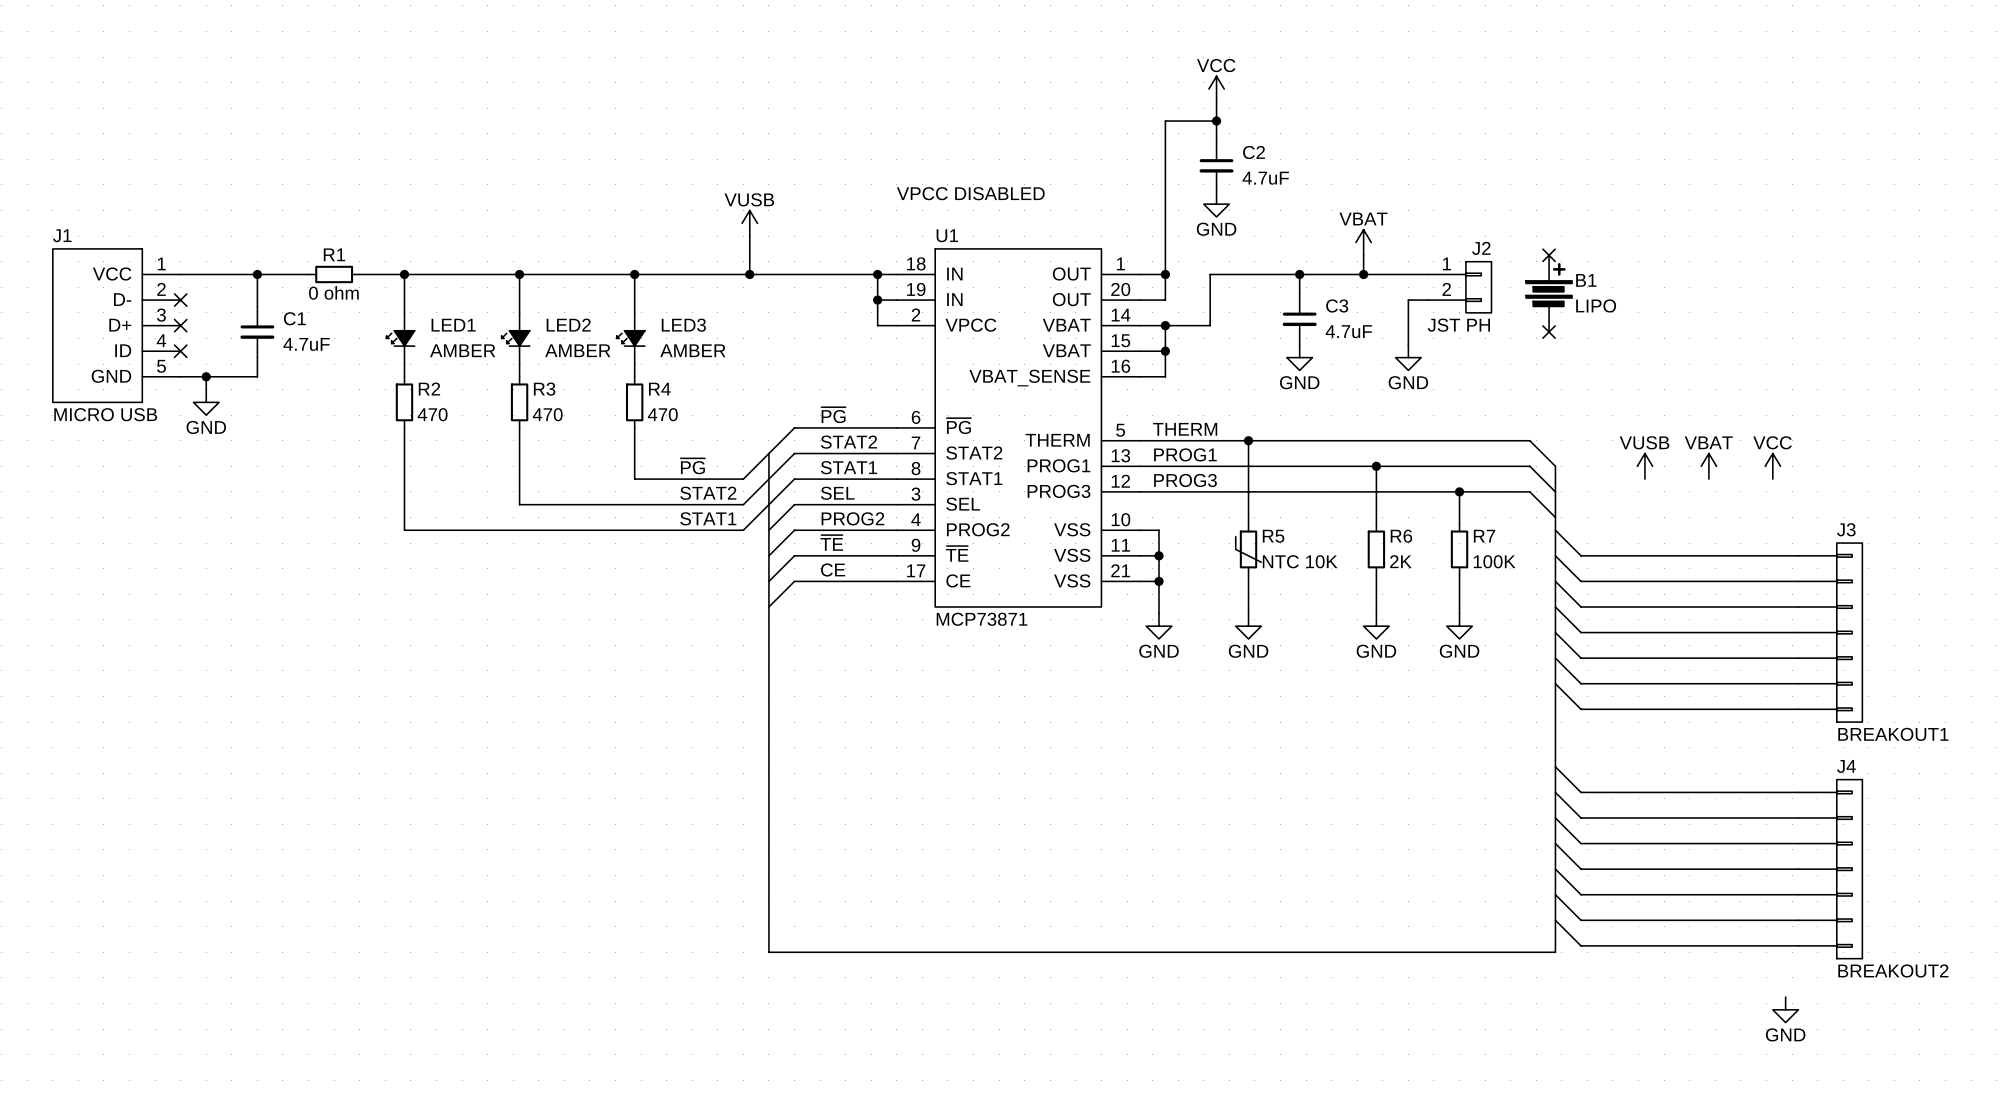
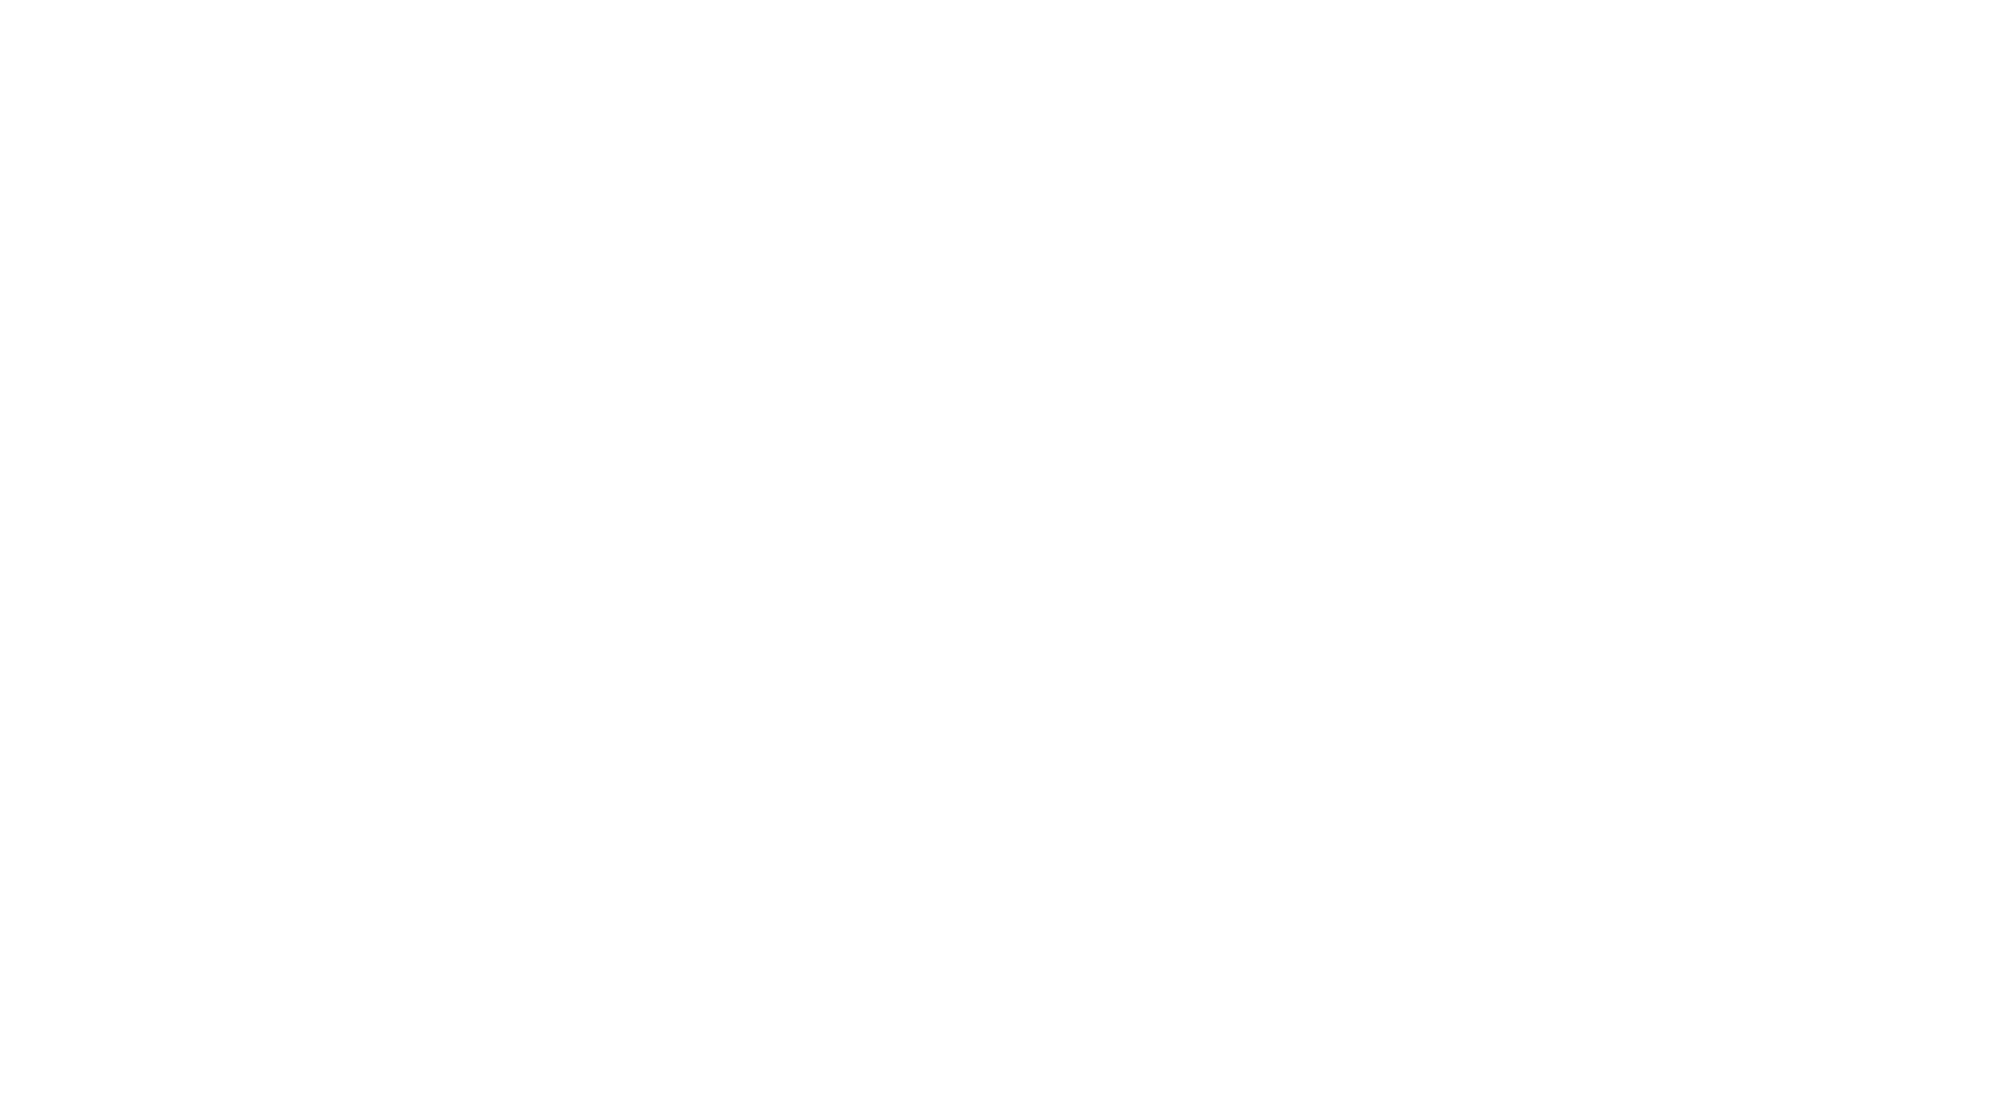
power symbol: VCC (1216, 89) -> none
wire: (1216, 101) (1216, 140) -> none
wire: (1216, 121) (1165, 121) (1165, 300) (1139, 300) -> none
junction: (1216, 121) -> none
C2: 4.7uF (1216, 165) -> none
text: VPCC DISABLED (970, 193) -> none
power symbol: GND (1216, 204) -> none
power symbol: VUSB (749, 223) -> none
wire: (749, 236) (749, 274) -> none
power symbol: VBAT (1363, 242) -> none
wire: (1363, 255) (1363, 274) -> none
no-connect mark: (1549, 255) -> none
wire: (180, 274) (308, 274) -> none
wire: (257, 274) (257, 306) -> none
junction: (257, 274) -> none
R1: 0 ohm (334, 274) -> none
wire: (359, 274) (896, 274) -> none
wire: (404, 274) (404, 312) -> none
junction: (404, 274) -> none
wire: (519, 274) (519, 312) -> none
junction: (519, 274) -> none
wire: (634, 274) (634, 312) -> none
junction: (634, 274) -> none
junction: (749, 274) -> none
wire: (877, 274) (877, 325) (896, 325) -> none
junction: (877, 274) -> none
wire: (1139, 274) (1165, 274) -> none
junction: (1165, 274) -> none
wire: (1299, 274) (1299, 293) -> none
junction: (1299, 274) -> none
junction: (1363, 274) -> none
wire: (1427, 274) (1210, 274) (1210, 325) (1139, 325) -> none
J2: JST PH (1459, 287) -> none
B1: LIPO (1549, 293) -> none
no-connect mark: (180, 300) -> none
wire: (877, 300) (896, 300) -> none
junction: (877, 300) -> none
wire: (1427, 300) (1408, 300) (1408, 344) -> none
C3: 4.7uF (1299, 319) -> none
J1: MICRO USB (116, 325) -> none
no-connect mark: (180, 325) -> none
wire: (1165, 325) (1165, 376) (1139, 376) -> none
junction: (1165, 325) -> none
C1: 4.7uF (257, 332) -> none
no-connect mark: (1549, 332) -> none
LED1: AMBER (400, 338) -> none
LED2: AMBER (515, 338) -> none
LED3: AMBER (630, 338) -> none
no-connect mark: (180, 351) -> none
wire: (1139, 351) (1165, 351) -> none
junction: (1165, 351) -> none
wire: (257, 357) (257, 376) (180, 376) -> none
power symbol: GND (1299, 357) -> none
power symbol: GND (1408, 357) -> none
wire: (404, 364) (404, 376) -> none
wire: (519, 364) (519, 376) -> none
wire: (634, 364) (634, 376) -> none
wire: (206, 376) (206, 389) -> none
junction: (206, 376) -> none
power symbol: GND (206, 402) -> none
R2: 470 (404, 402) -> none
R3: 470 (519, 402) -> none
R4: 470 (634, 402) -> none
label: ~{PG} (833, 415) -> none
wire: (404, 427) (404, 530) (743, 530) (794, 479) (896, 479) -> none
wire: (519, 427) (519, 504) (743, 504) (794, 453) (896, 453) -> none
wire: (634, 427) (634, 479) (743, 479) (794, 427) (896, 427) -> none
U1: MCP73871 (1018, 427) -> none
label: THERM (1185, 429) -> none
wire: (1139, 440) (1529, 440) (1555, 466) -> none
wire: (1248, 440) (1248, 523) -> none
junction: (1248, 440) -> none
label: STAT2 (848, 442) -> none
bus: (768, 453) (768, 952) (1555, 952) (1555, 466) -> none
label: PROG1 (1185, 454) -> none
label: ~{PG} (692, 466) -> none
wire: (1139, 466) (1529, 466) (1555, 491) -> none
wire: (1376, 466) (1376, 523) -> none
junction: (1376, 466) -> none
power symbol: VUSB (1644, 466) -> none
power symbol: VBAT (1708, 466) -> none
power symbol: VCC (1772, 466) -> none
label: STAT1 (849, 467) -> none
label: PROG3 (1185, 480) -> none
wire: (1139, 491) (1529, 491) (1555, 517) -> none
wire: (1459, 491) (1459, 523) -> none
junction: (1459, 491) -> none
label: STAT2 (708, 493) -> none
label: SEL (837, 493) -> none
wire: (896, 504) (794, 504) (768, 530) -> none
label: STAT1 (708, 518) -> none
label: PROG2 (852, 518) -> none
wire: (896, 530) (794, 530) (768, 555) -> none
wire: (1139, 530) (1159, 530) (1159, 613) -> none
wire: (1555, 530) (1581, 555) (1798, 555) -> none
label: ~{TE} (831, 542) -> none
R5: NTC 10K (1248, 549) -> none
R6: 2K (1376, 549) -> none
R7: 100K (1459, 549) -> none
wire: (896, 555) (794, 555) (768, 581) -> none
wire: (1139, 555) (1159, 555) -> none
junction: (1159, 555) -> none
wire: (1555, 555) (1581, 581) (1798, 581) -> none
label: CE (833, 569) -> none
wire: (1248, 575) (1248, 613) -> none
wire: (1376, 575) (1376, 613) -> none
wire: (1459, 575) (1459, 613) -> none
wire: (896, 581) (794, 581) (768, 606) -> none
wire: (1139, 581) (1159, 581) -> none
junction: (1159, 581) -> none
wire: (1555, 581) (1581, 606) (1798, 606) -> none
wire: (1555, 606) (1581, 632) (1798, 632) -> none
power symbol: GND (1159, 626) -> none
power symbol: GND (1248, 626) -> none
power symbol: GND (1376, 626) -> none
power symbol: GND (1459, 626) -> none
wire: (1555, 632) (1581, 658) (1798, 658) -> none
J3: BREAKOUT1 (1830, 632) -> none
wire: (1555, 658) (1581, 683) (1798, 683) -> none
wire: (1555, 683) (1581, 709) (1798, 709) -> none
wire: (1555, 766) (1581, 792) (1798, 792) -> none
wire: (1555, 792) (1581, 818) (1798, 818) -> none
wire: (1555, 818) (1581, 843) (1798, 843) -> none
wire: (1555, 843) (1581, 869) (1798, 869) -> none
wire: (1555, 869) (1581, 894) (1798, 894) -> none
J4: BREAKOUT2 (1830, 869) -> none
wire: (1555, 894) (1581, 920) (1798, 920) -> none
wire: (1555, 920) (1581, 945) (1798, 945) -> none
power symbol: GND (1785, 1009) -> none

